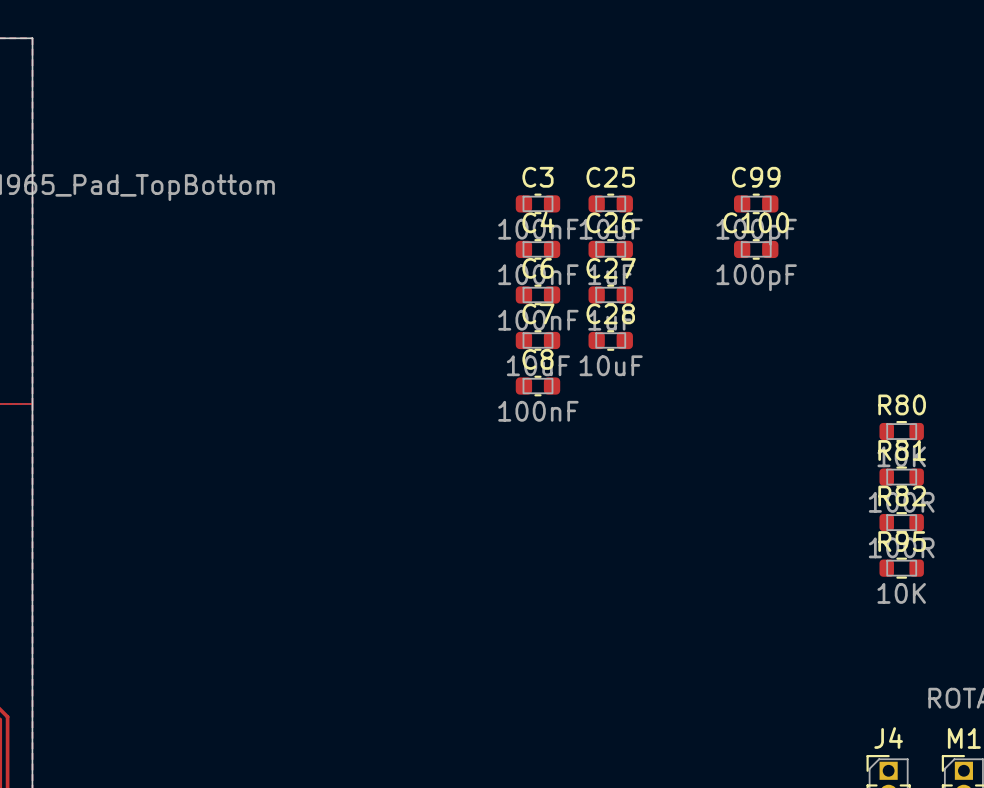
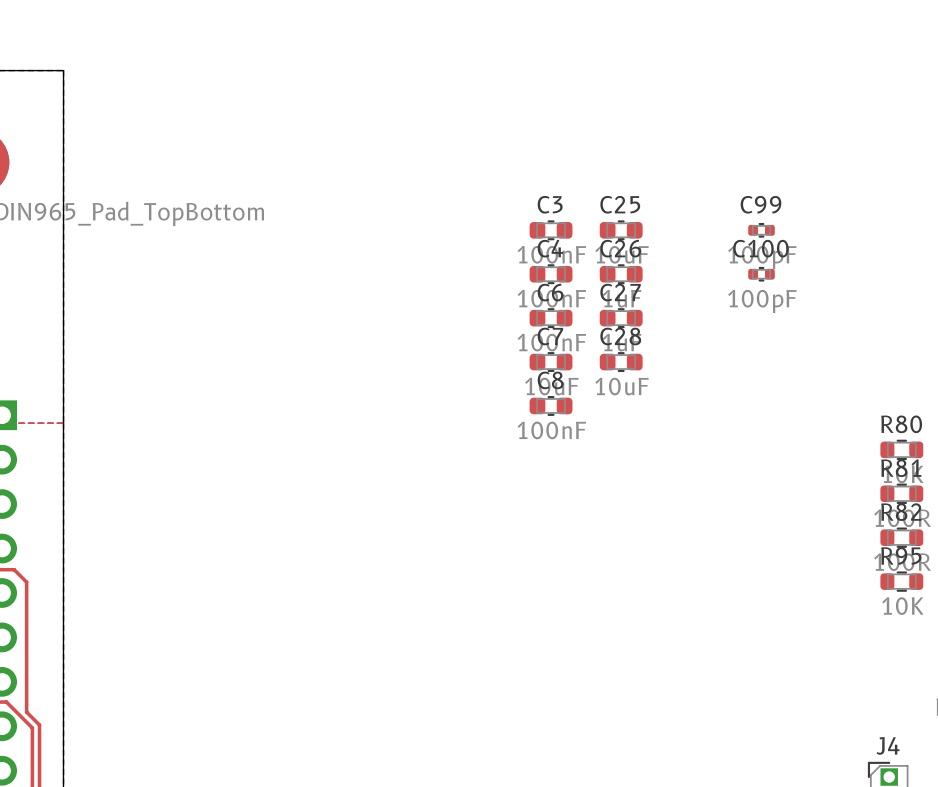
C99 footprint: [733, 193, 779, 215] -> [748, 222, 775, 238]
C100 footprint: [733, 239, 779, 260] -> [748, 266, 775, 282]

